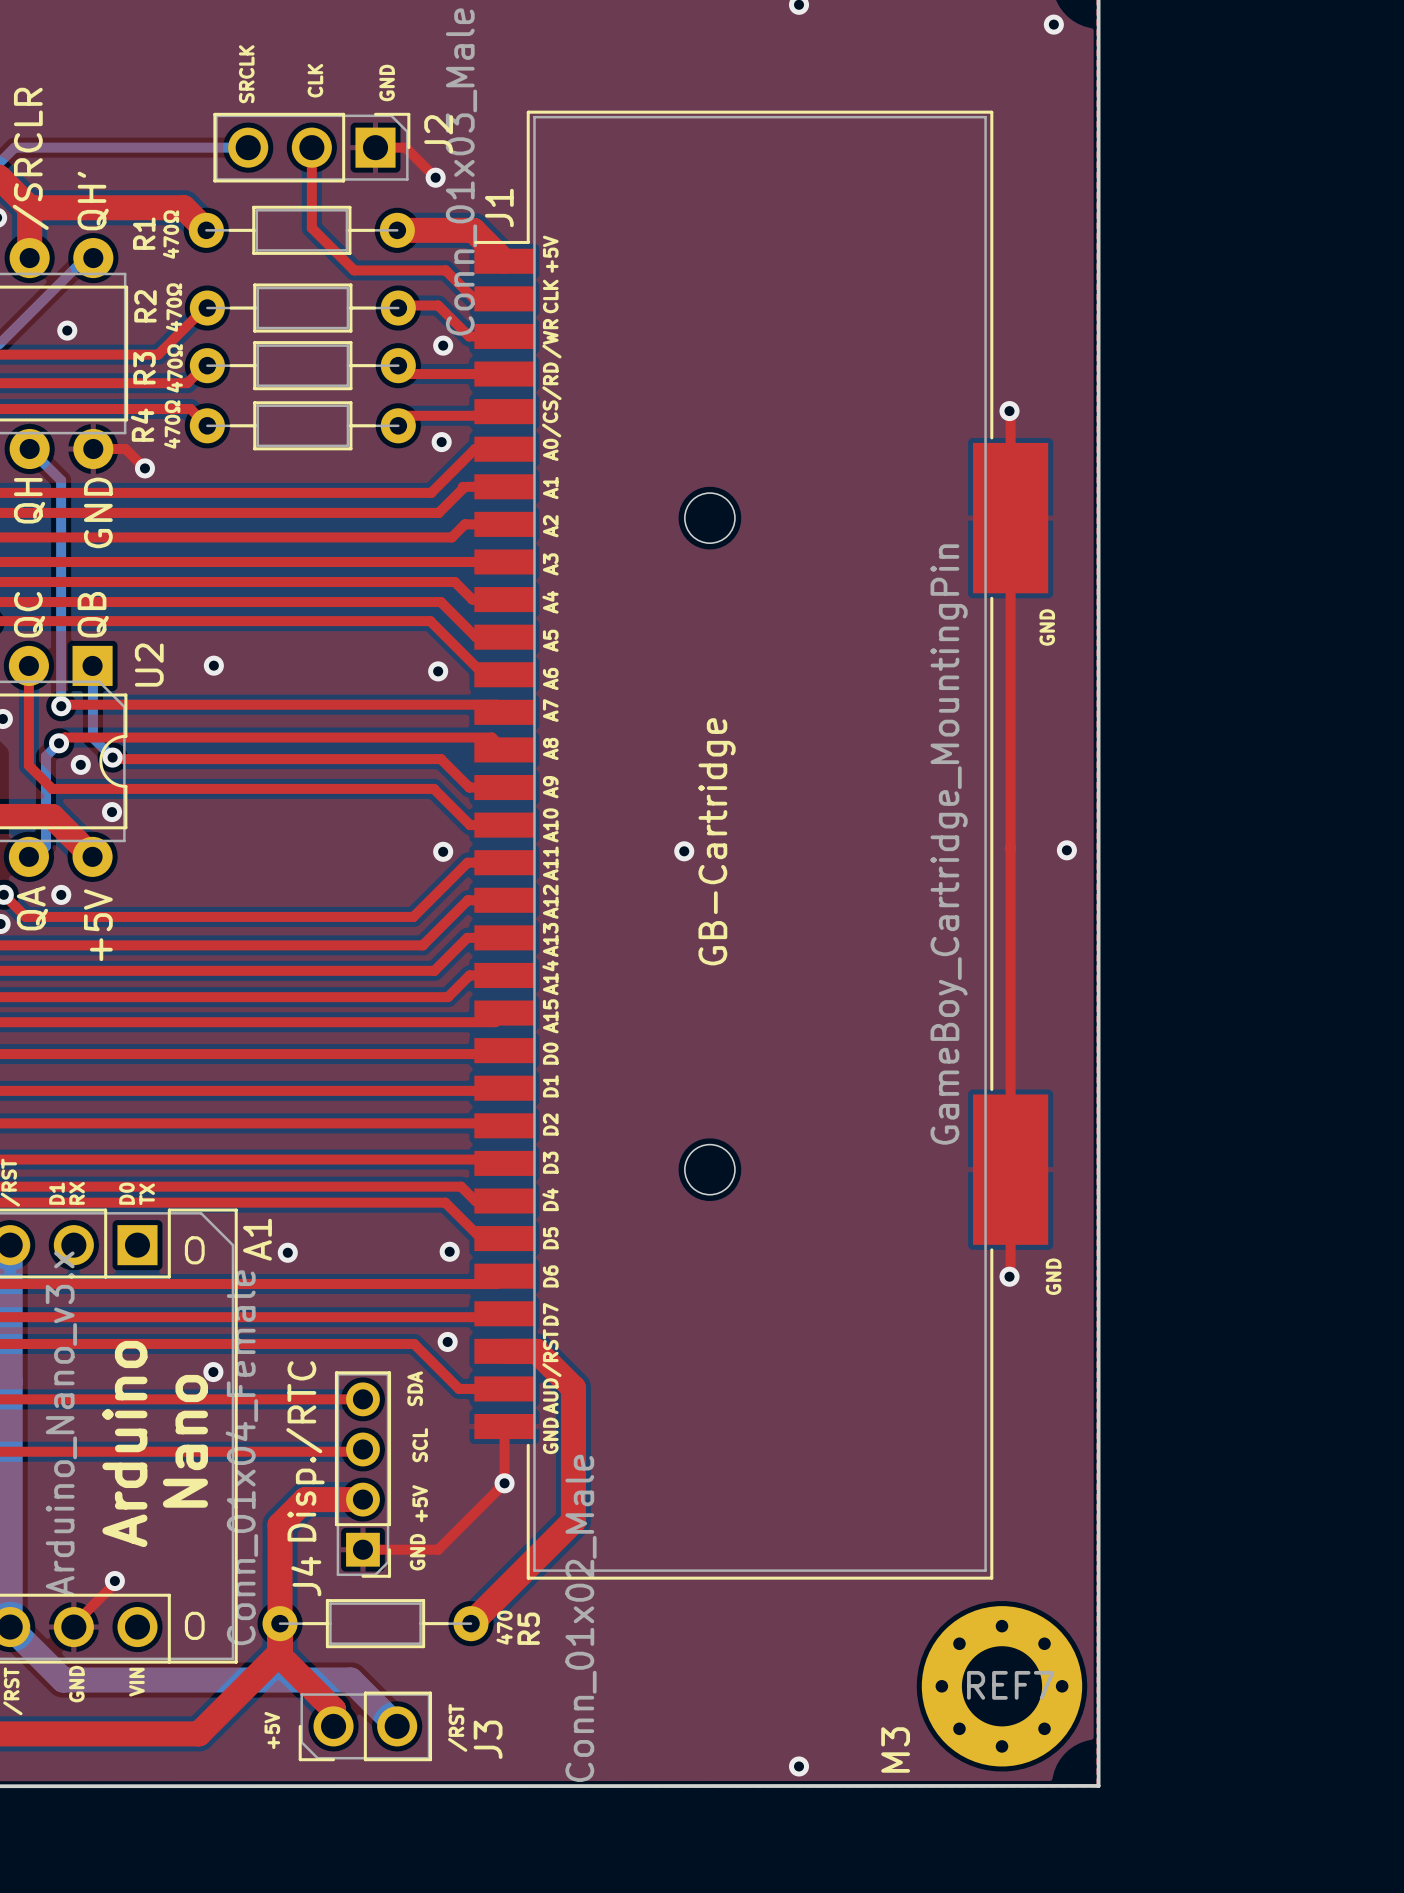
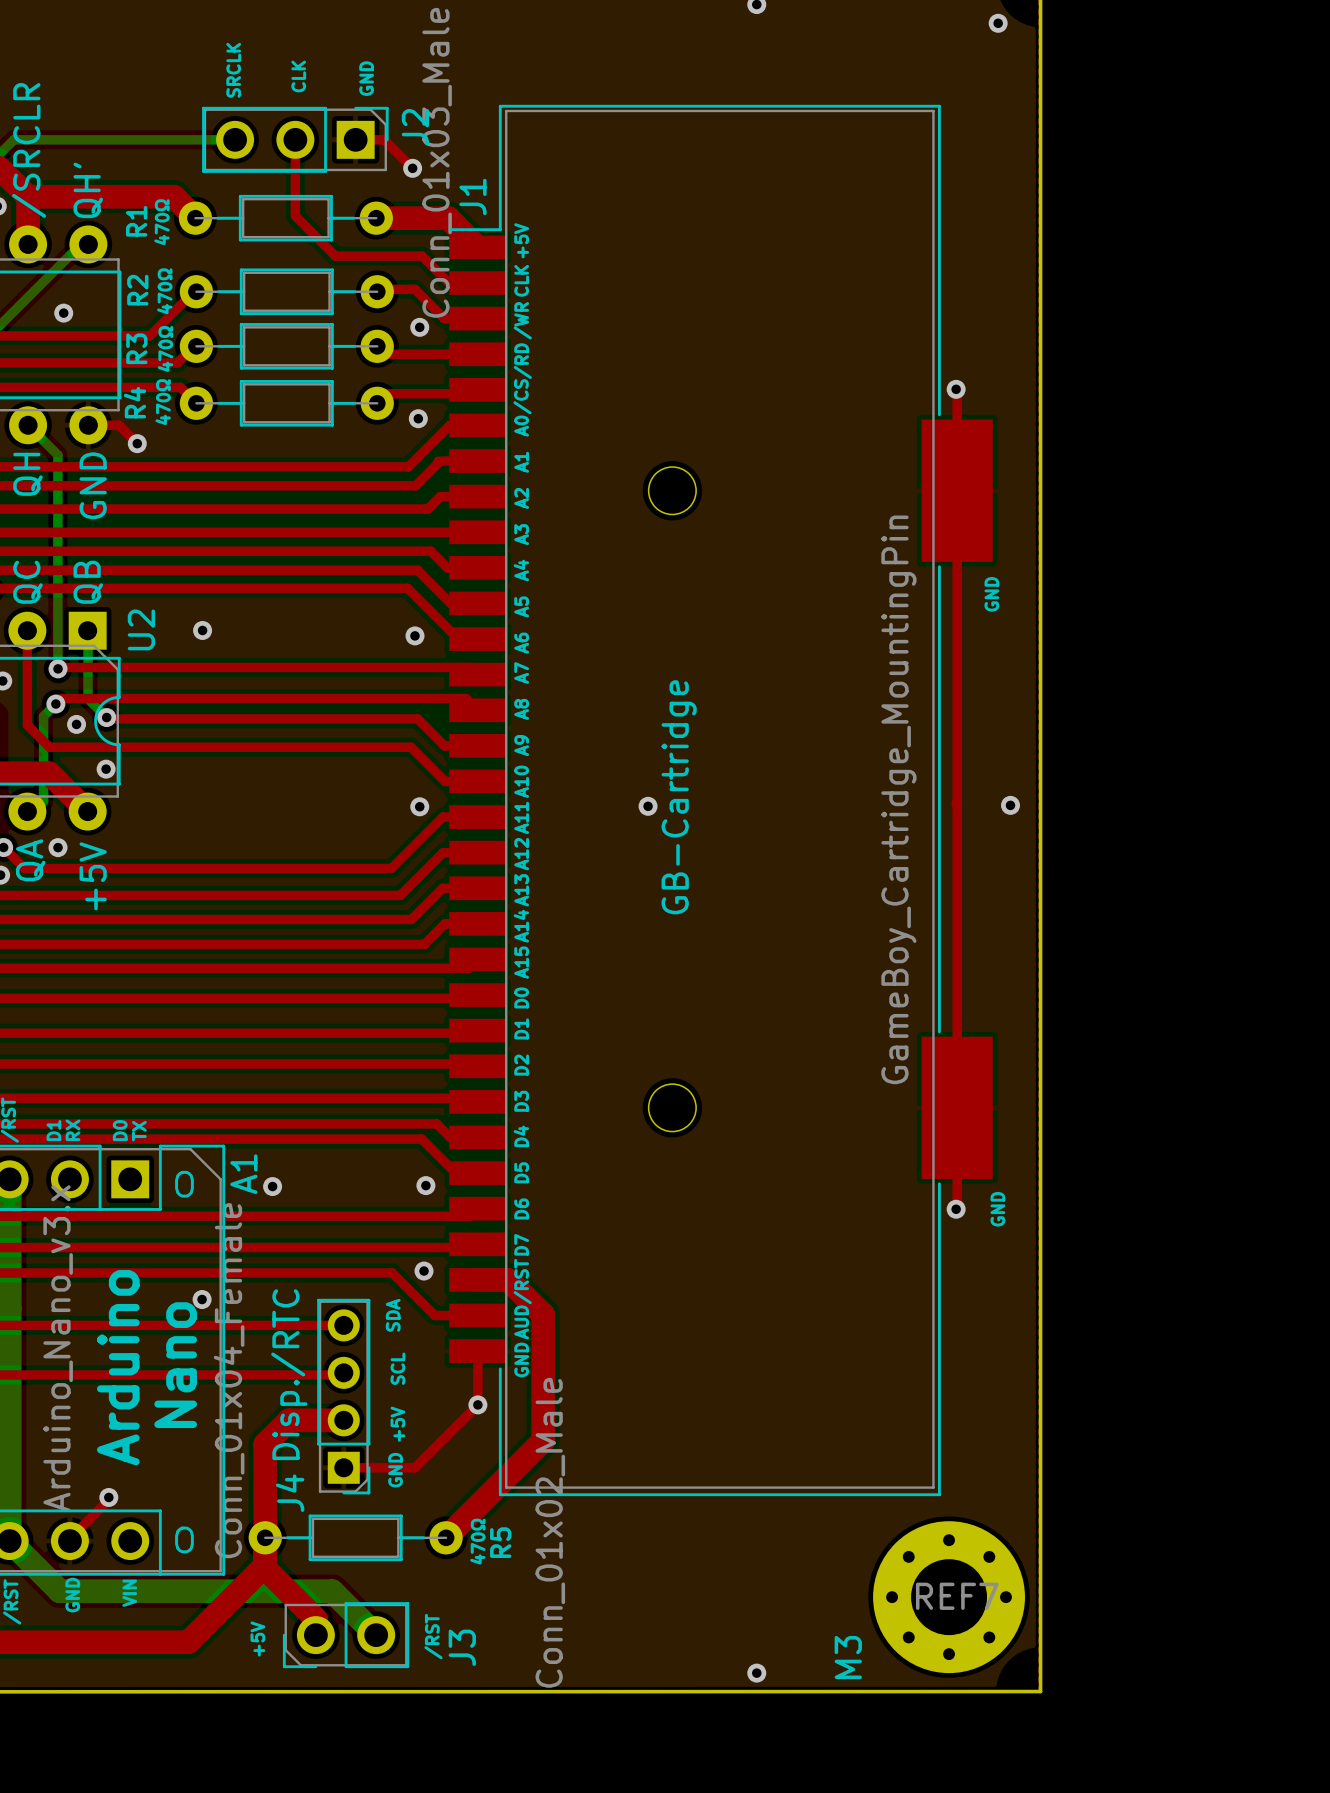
R5 value: 470 (504, 1627) -> 470Ω (477, 1541)

